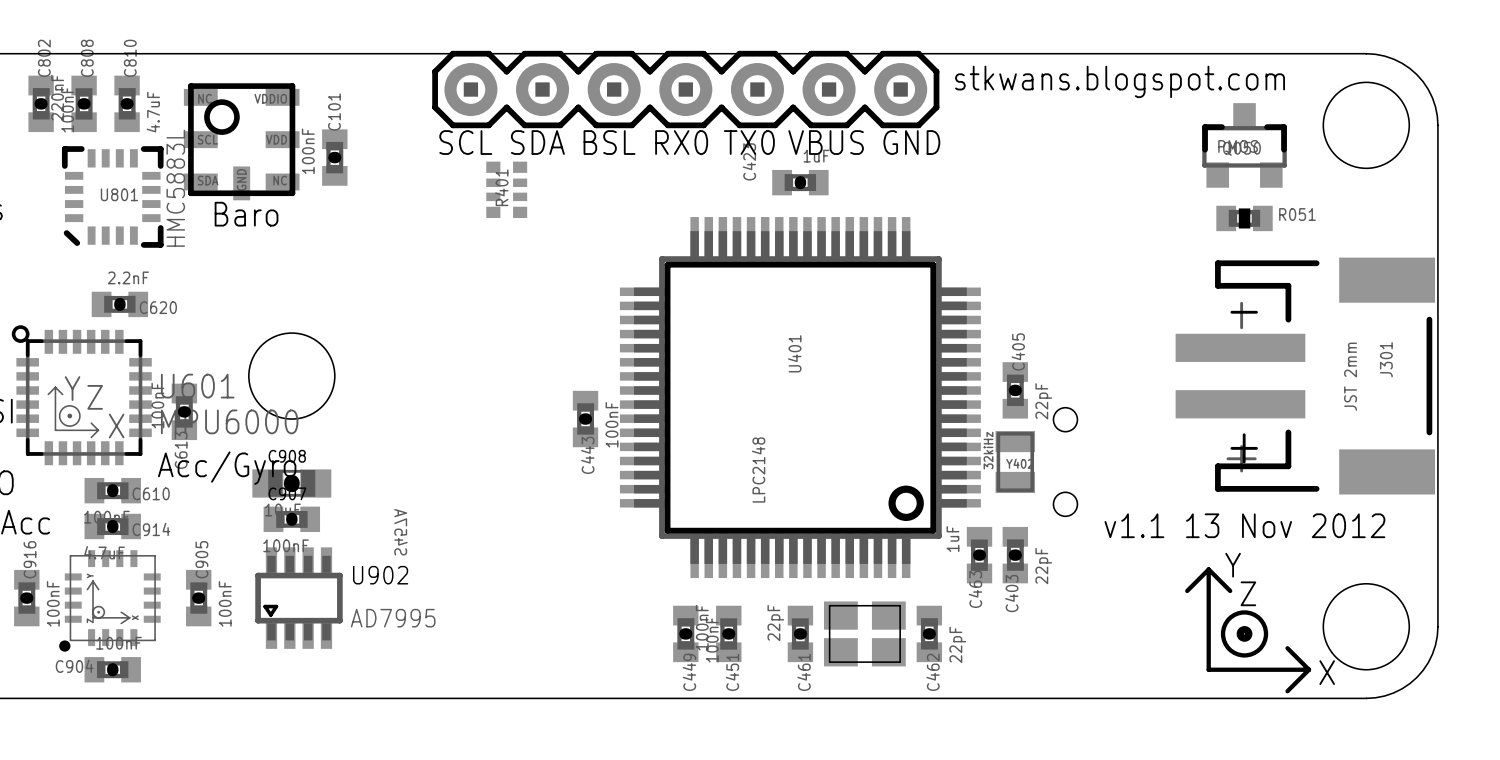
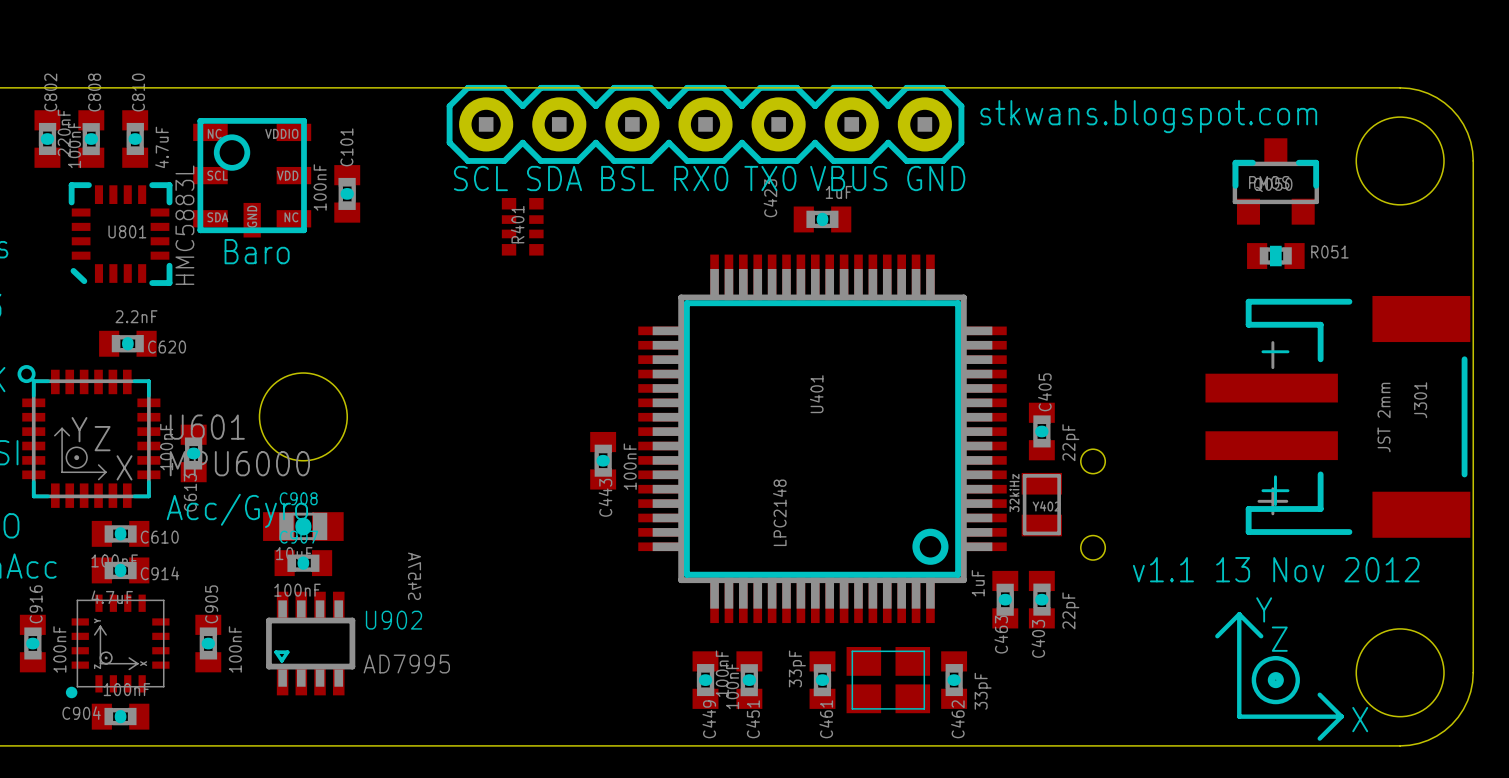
C461 value: 22pF (775, 622) -> 33pF (797, 668)
C462 value: 22pF (957, 644) -> 33pF (983, 691)

